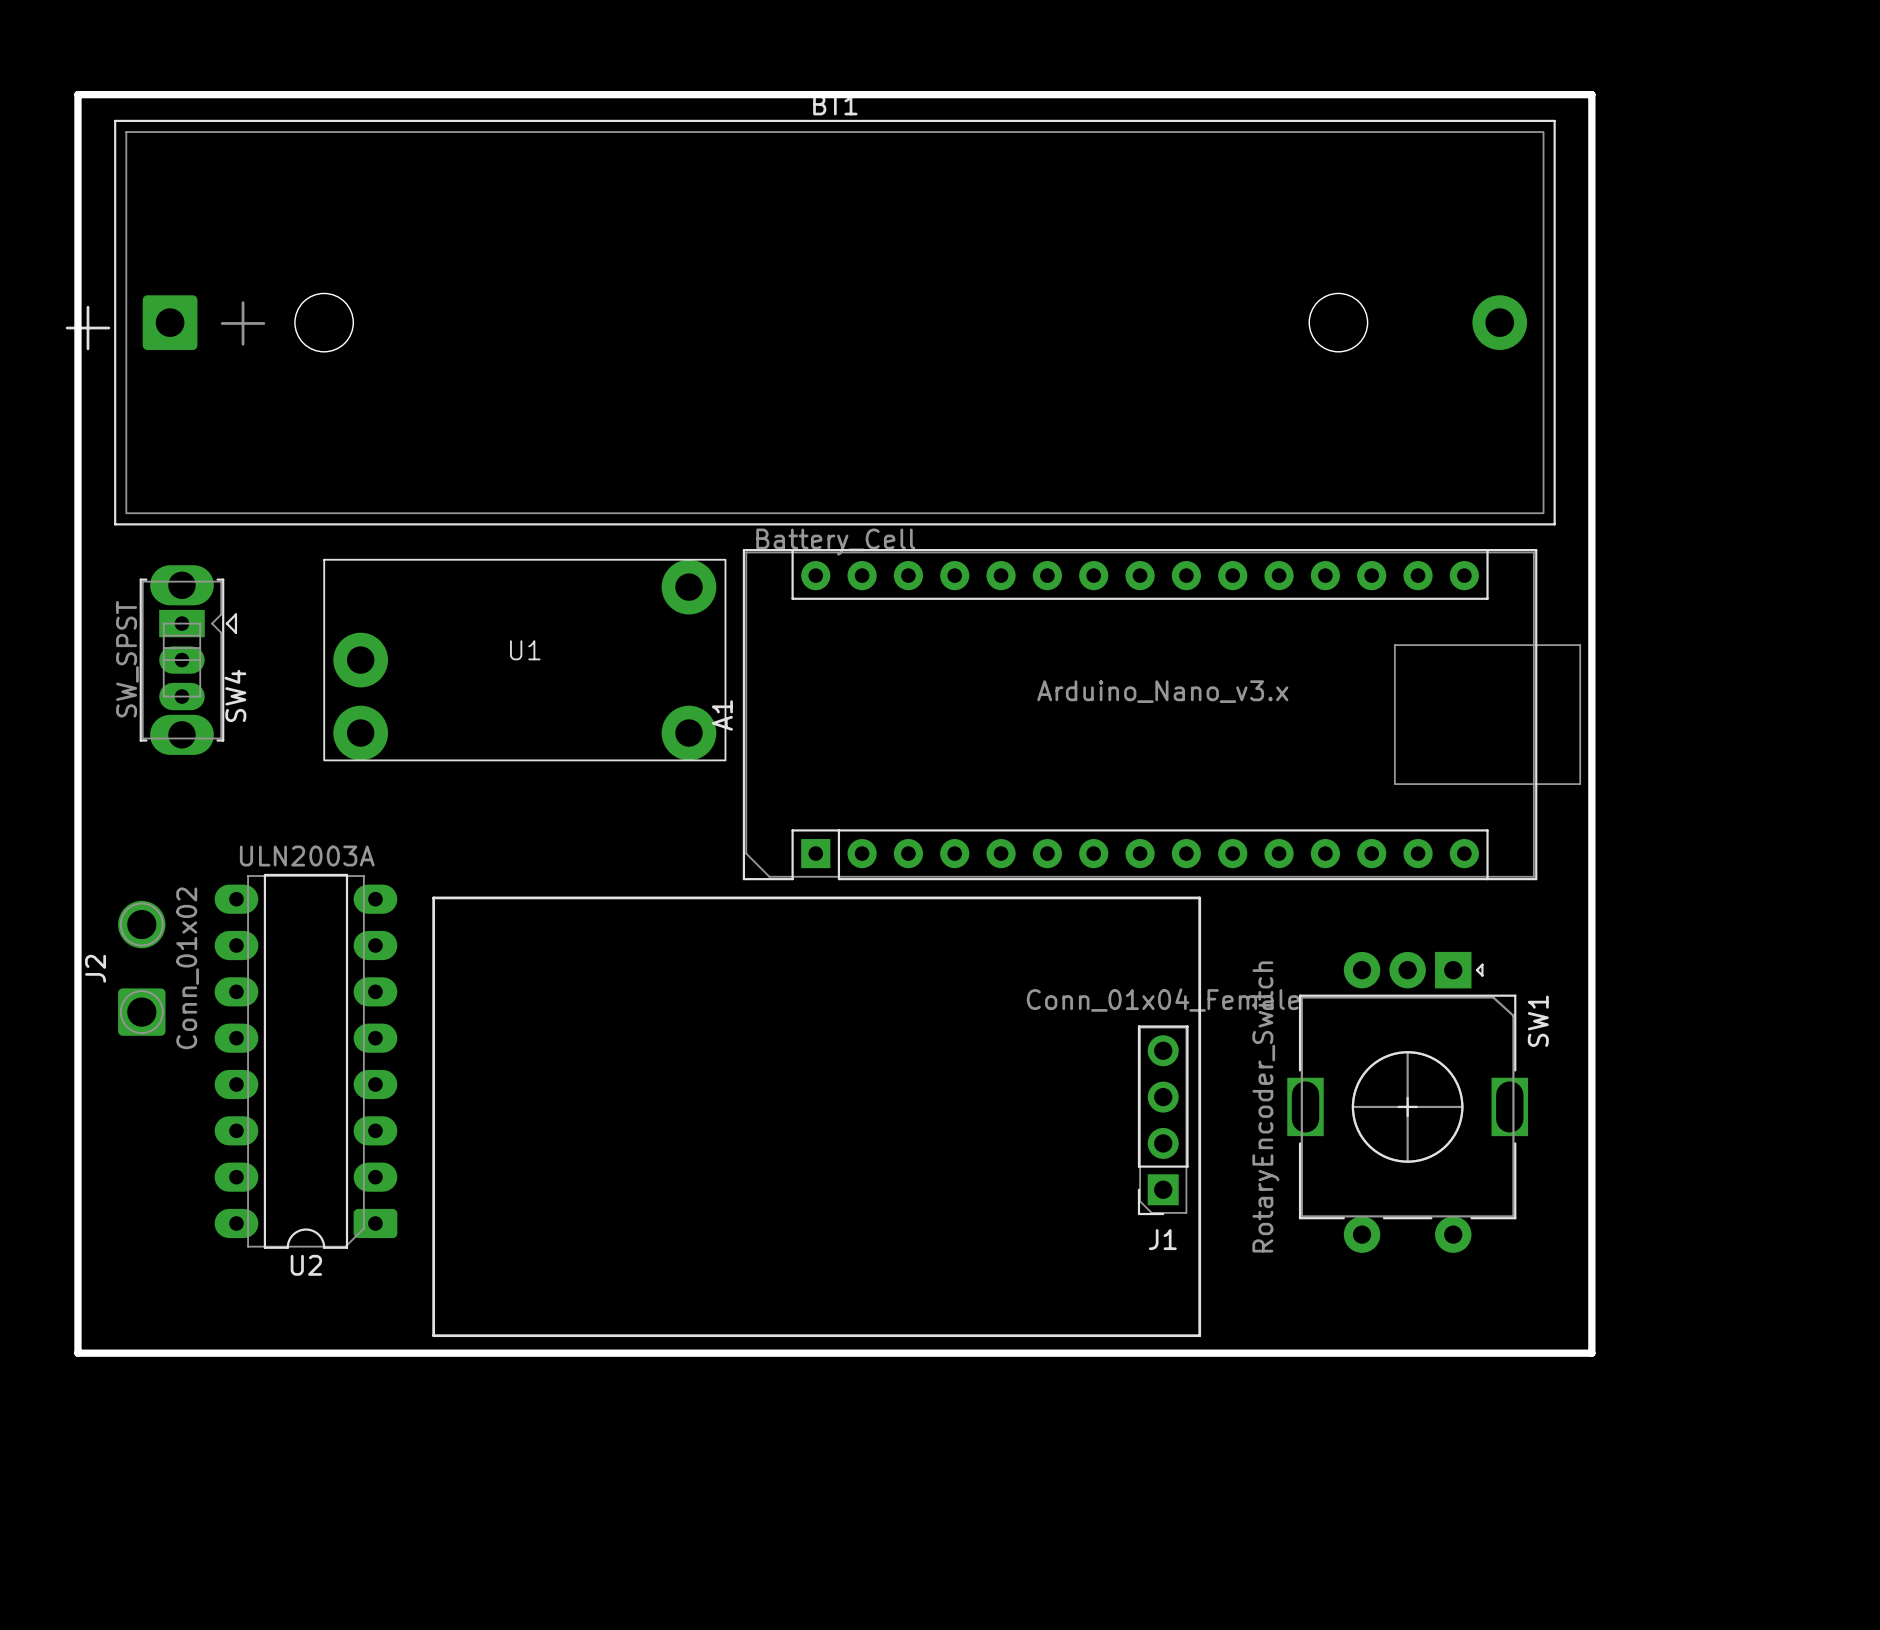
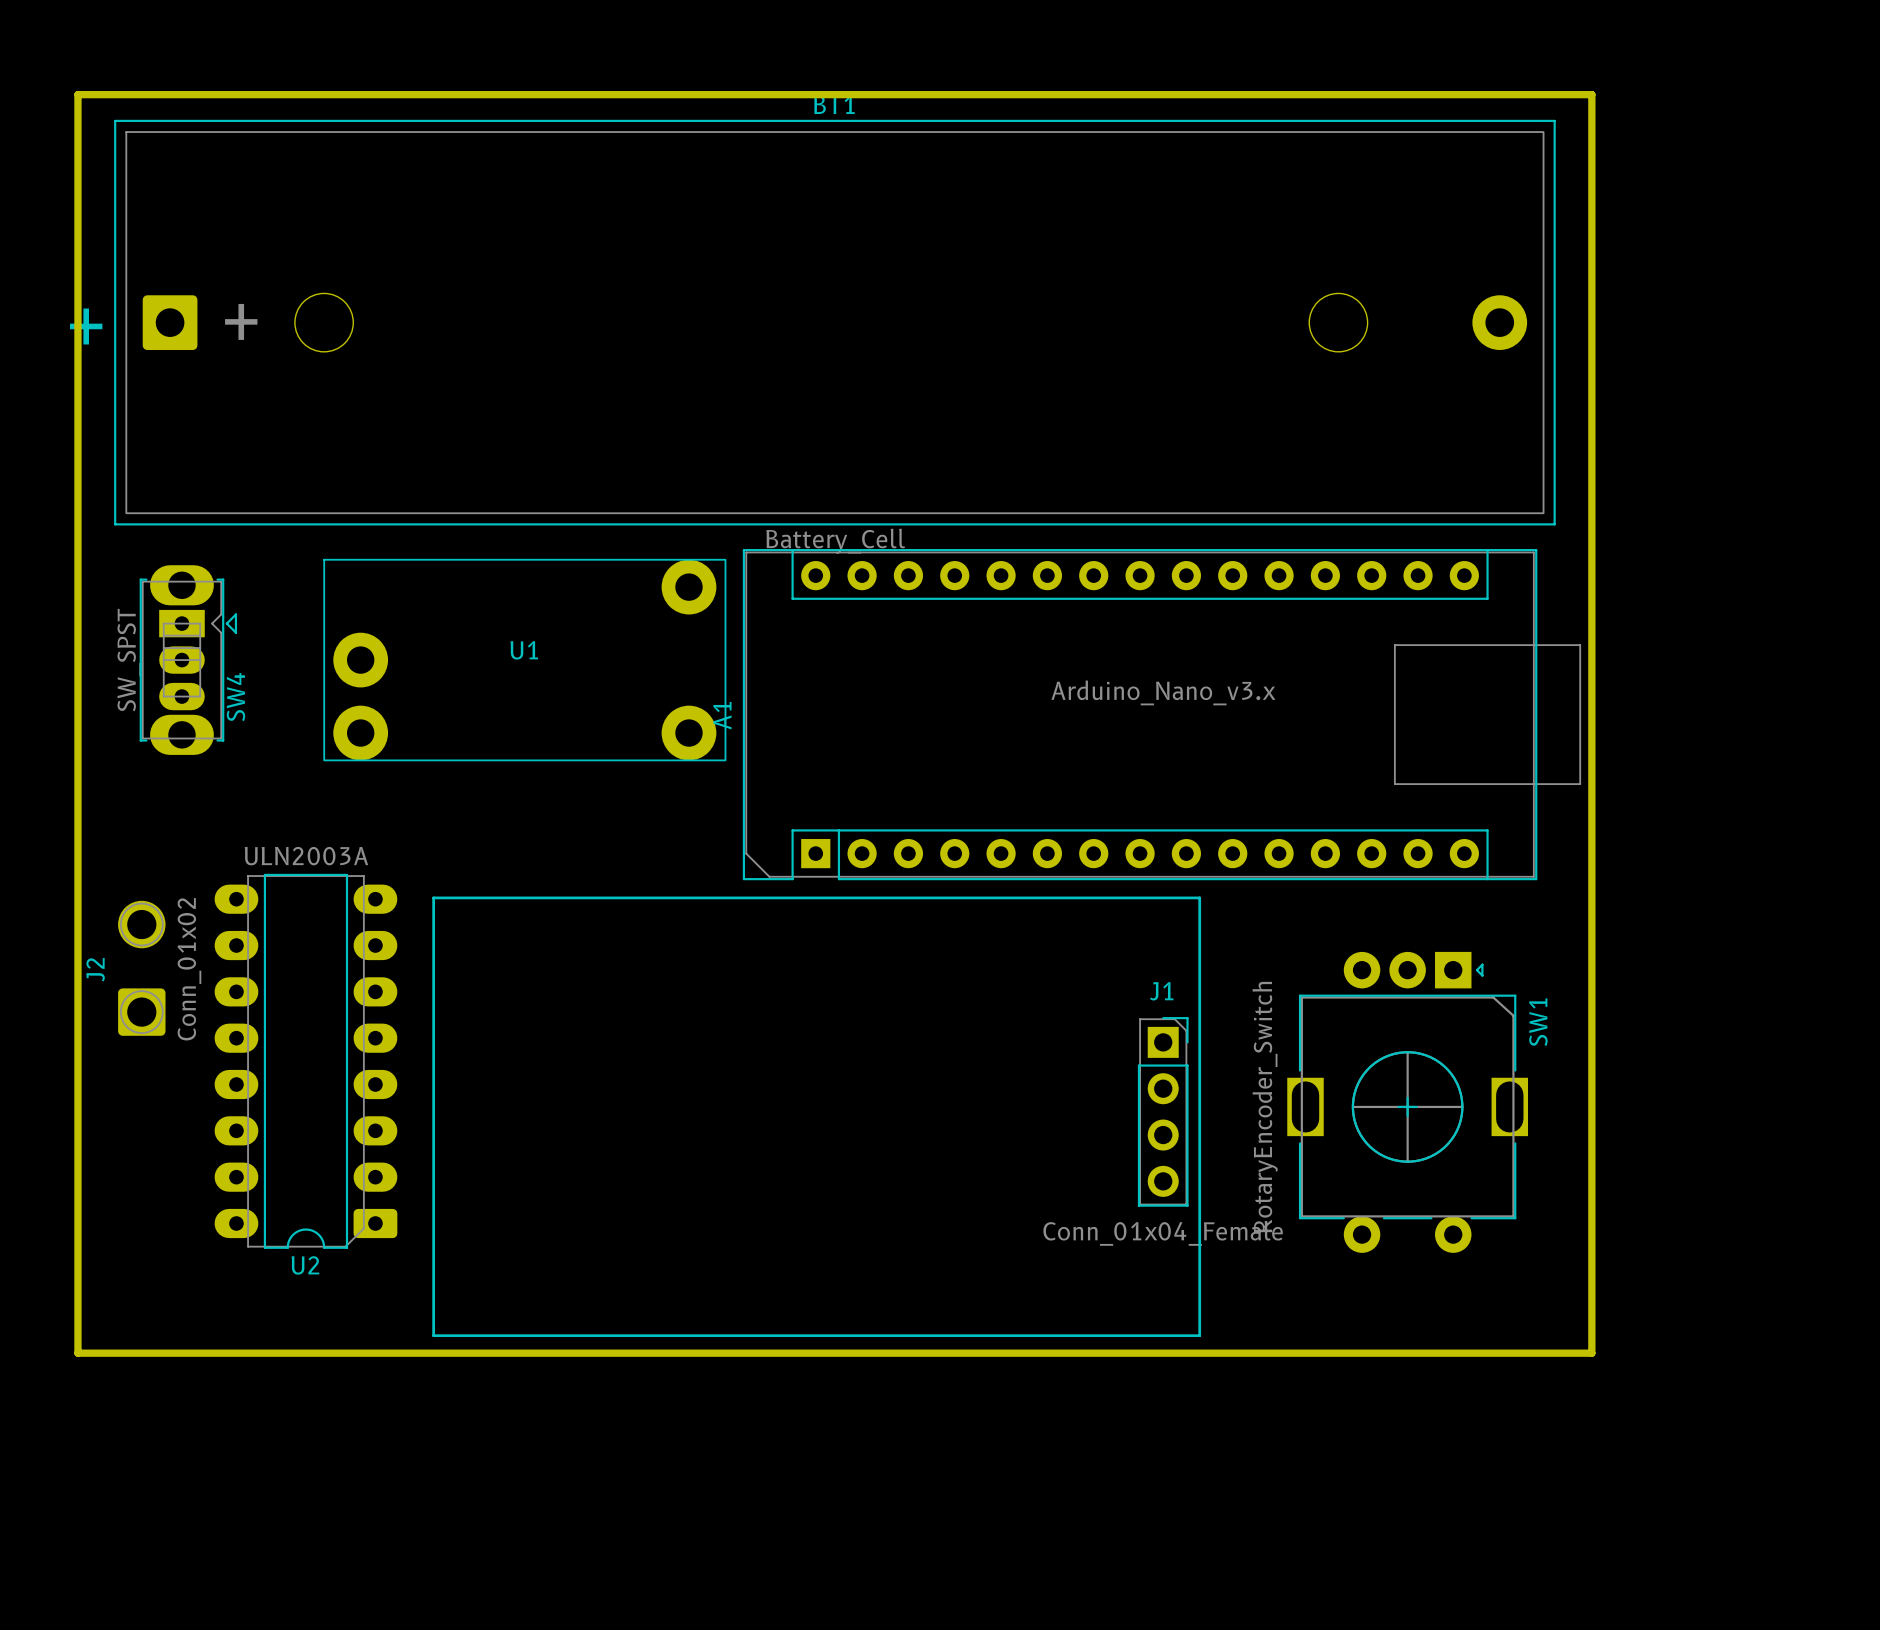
J1 rotation: 0° (1163, 1120) -> 180° (1163, 1111)

